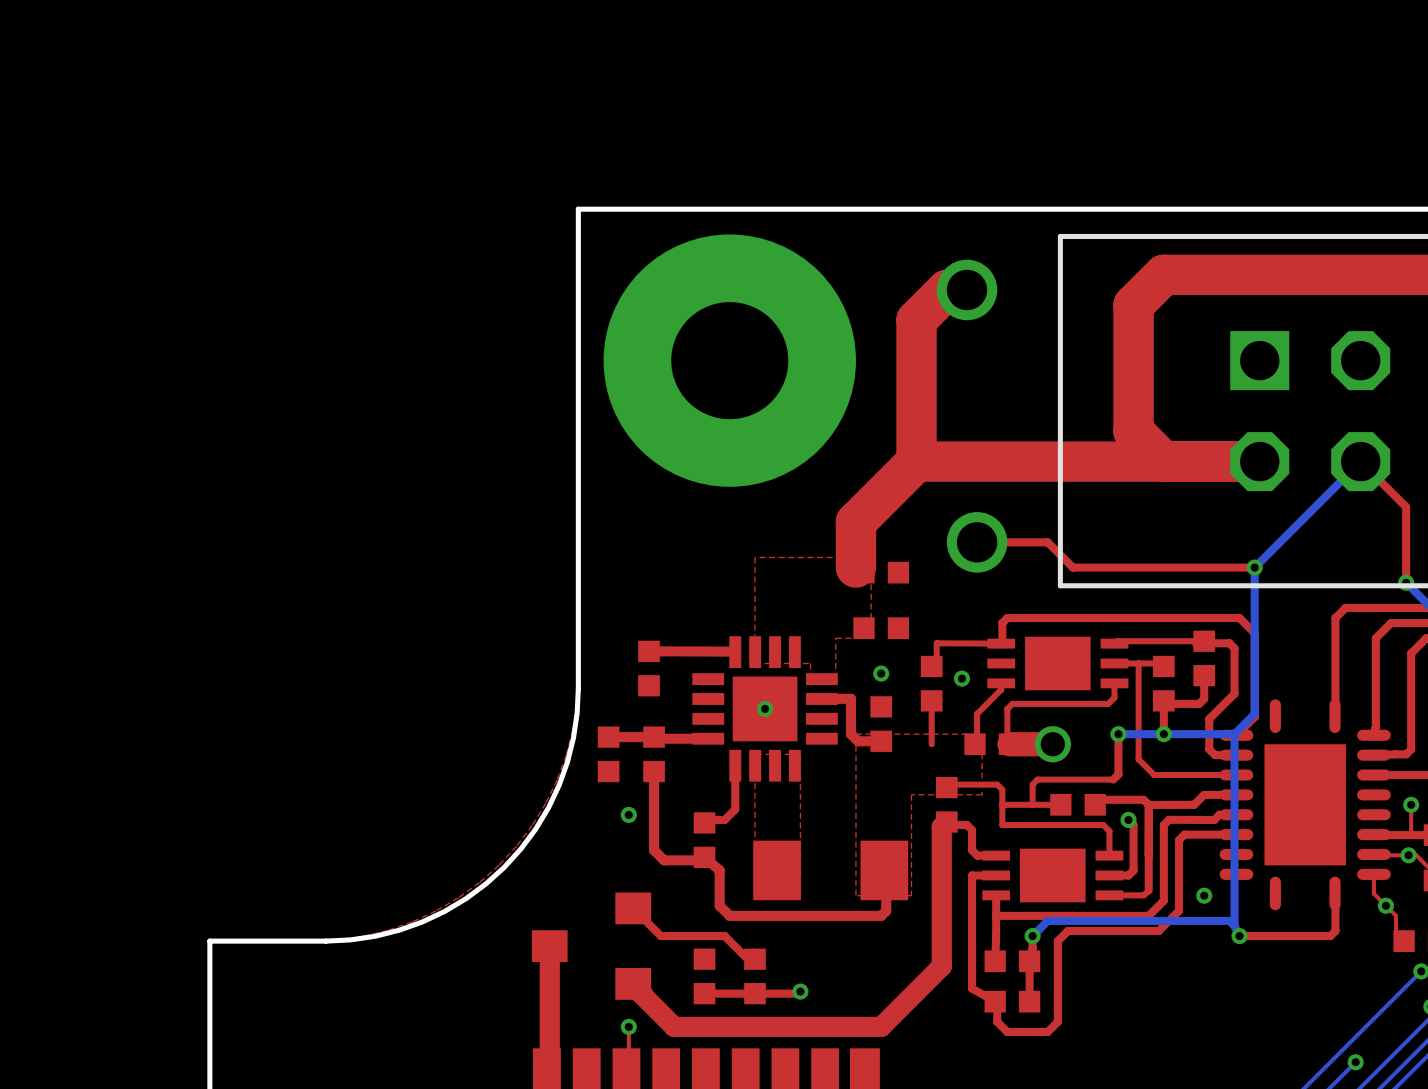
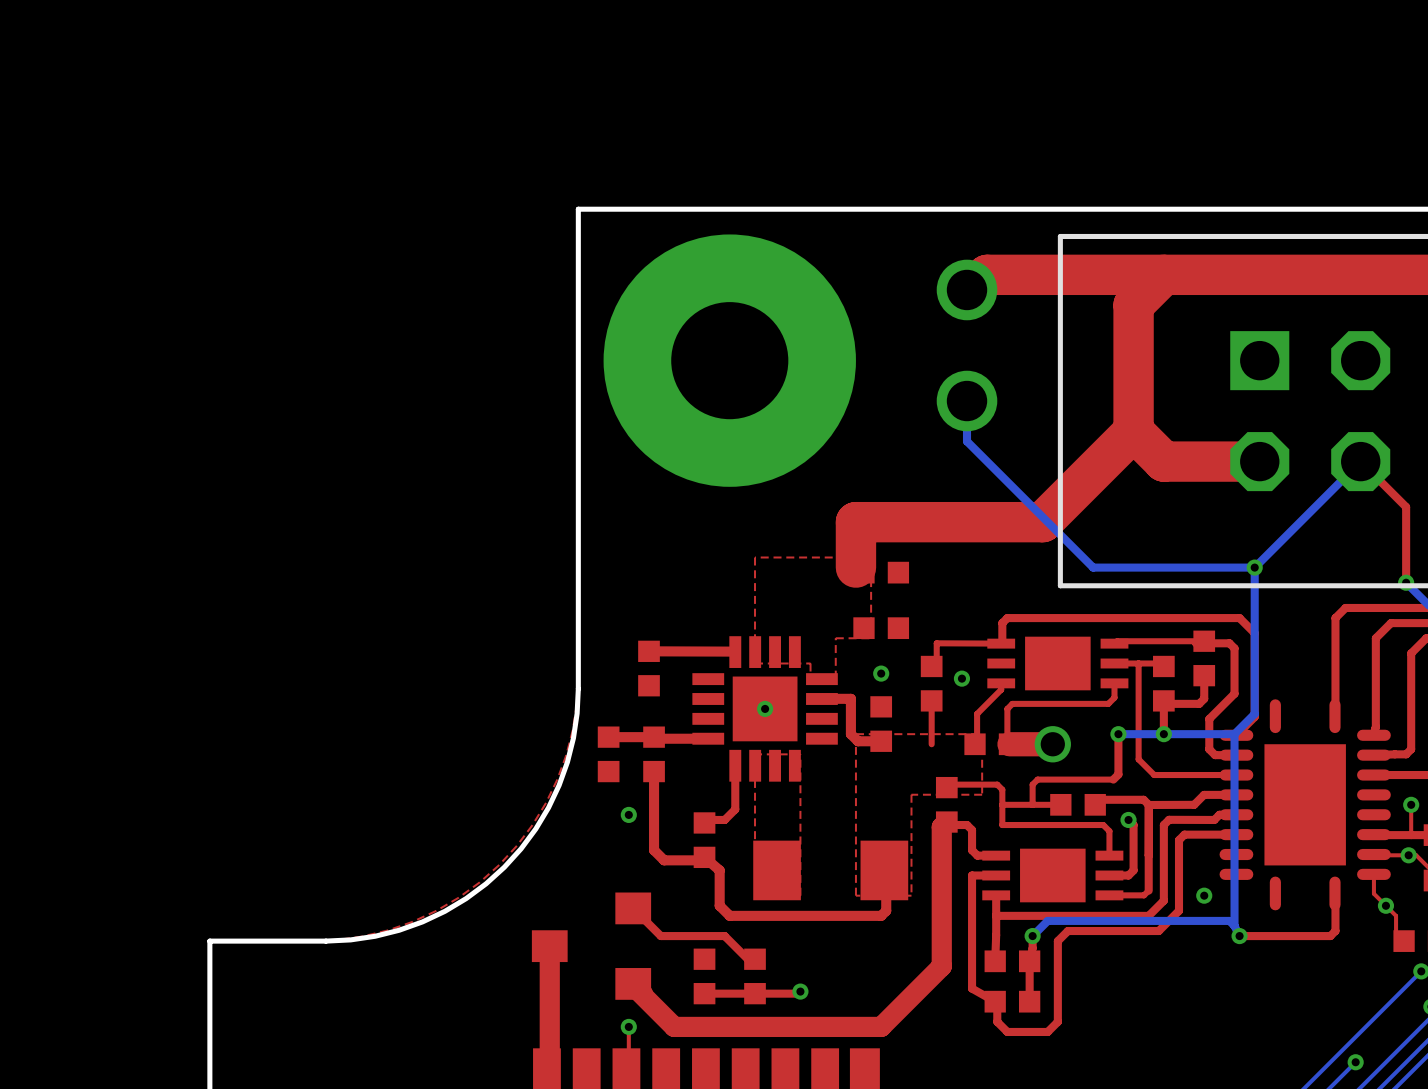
top track: (967, 289) (946, 289) (916, 320) (916, 461) -> (967, 289) (987, 274) (1163, 274)
bottom track: none -> (967, 401) (967, 441) (1093, 567) (1254, 567)
top track: (916, 461) (855, 522) -> (1133, 431) (1042, 522) (855, 522)
top track: (1163, 461) (916, 461) -> none
top track: (977, 542) (1047, 542) (1073, 567) (1254, 567) -> none
part position: (977, 542) -> (967, 401)

